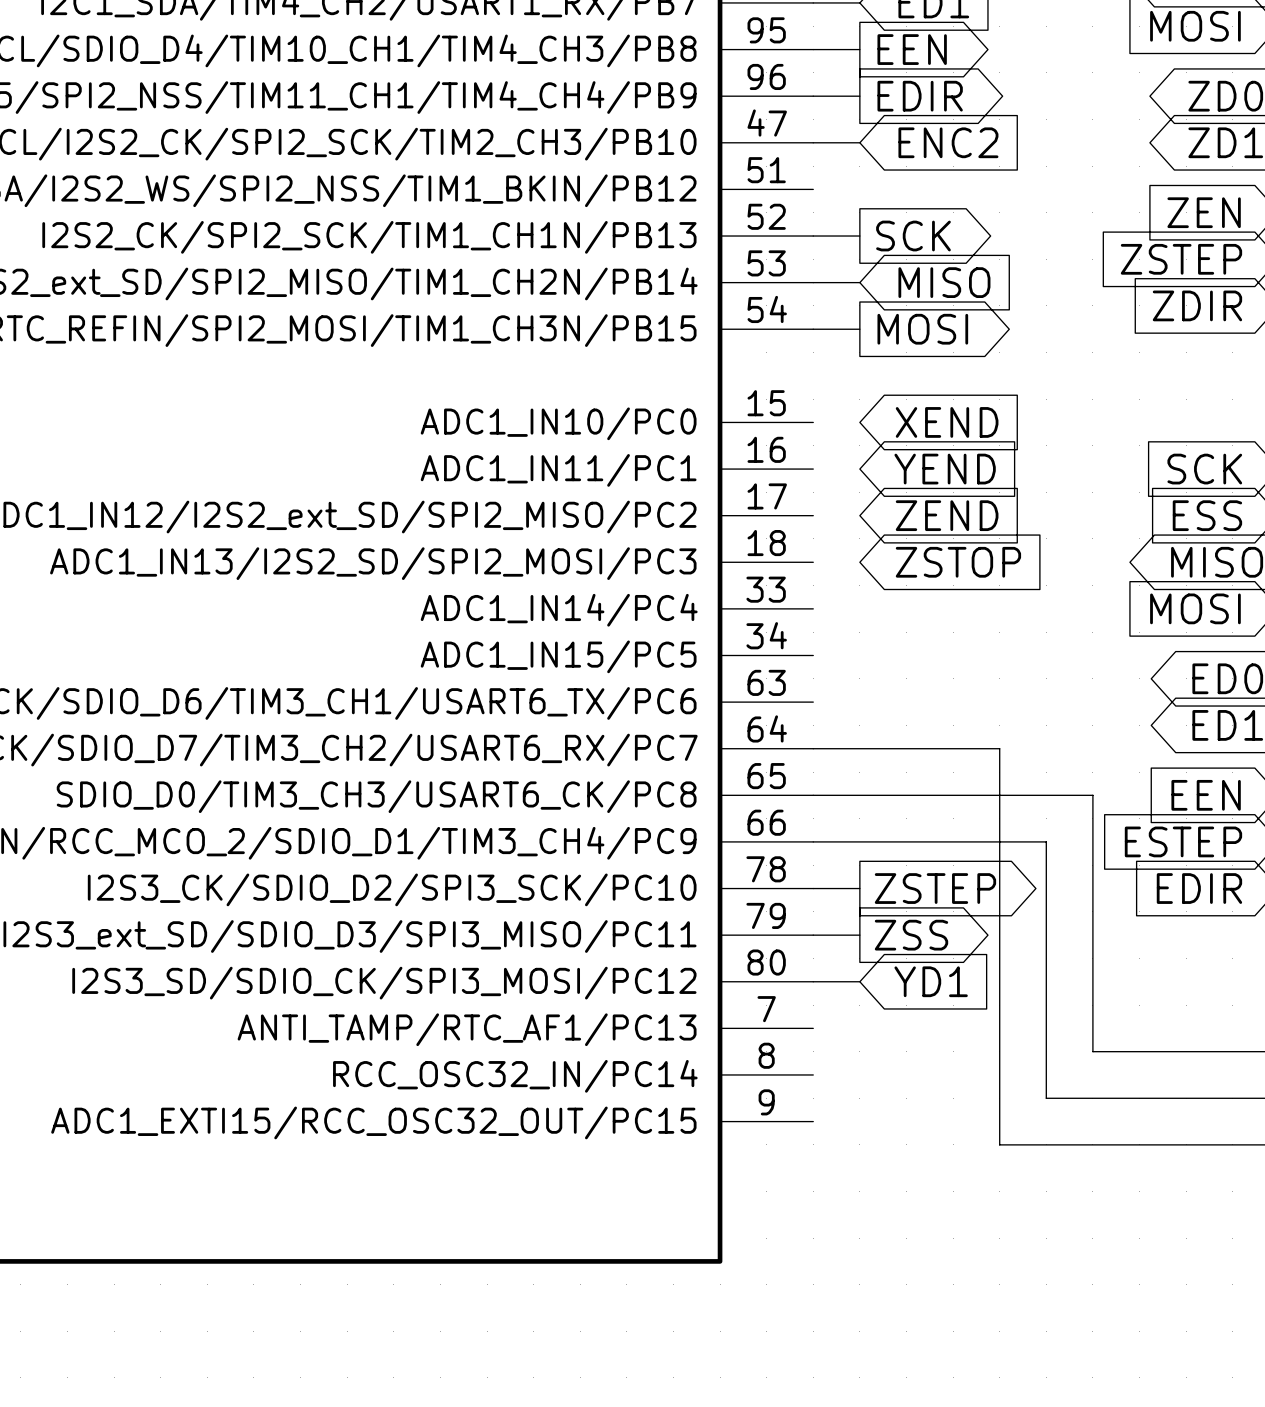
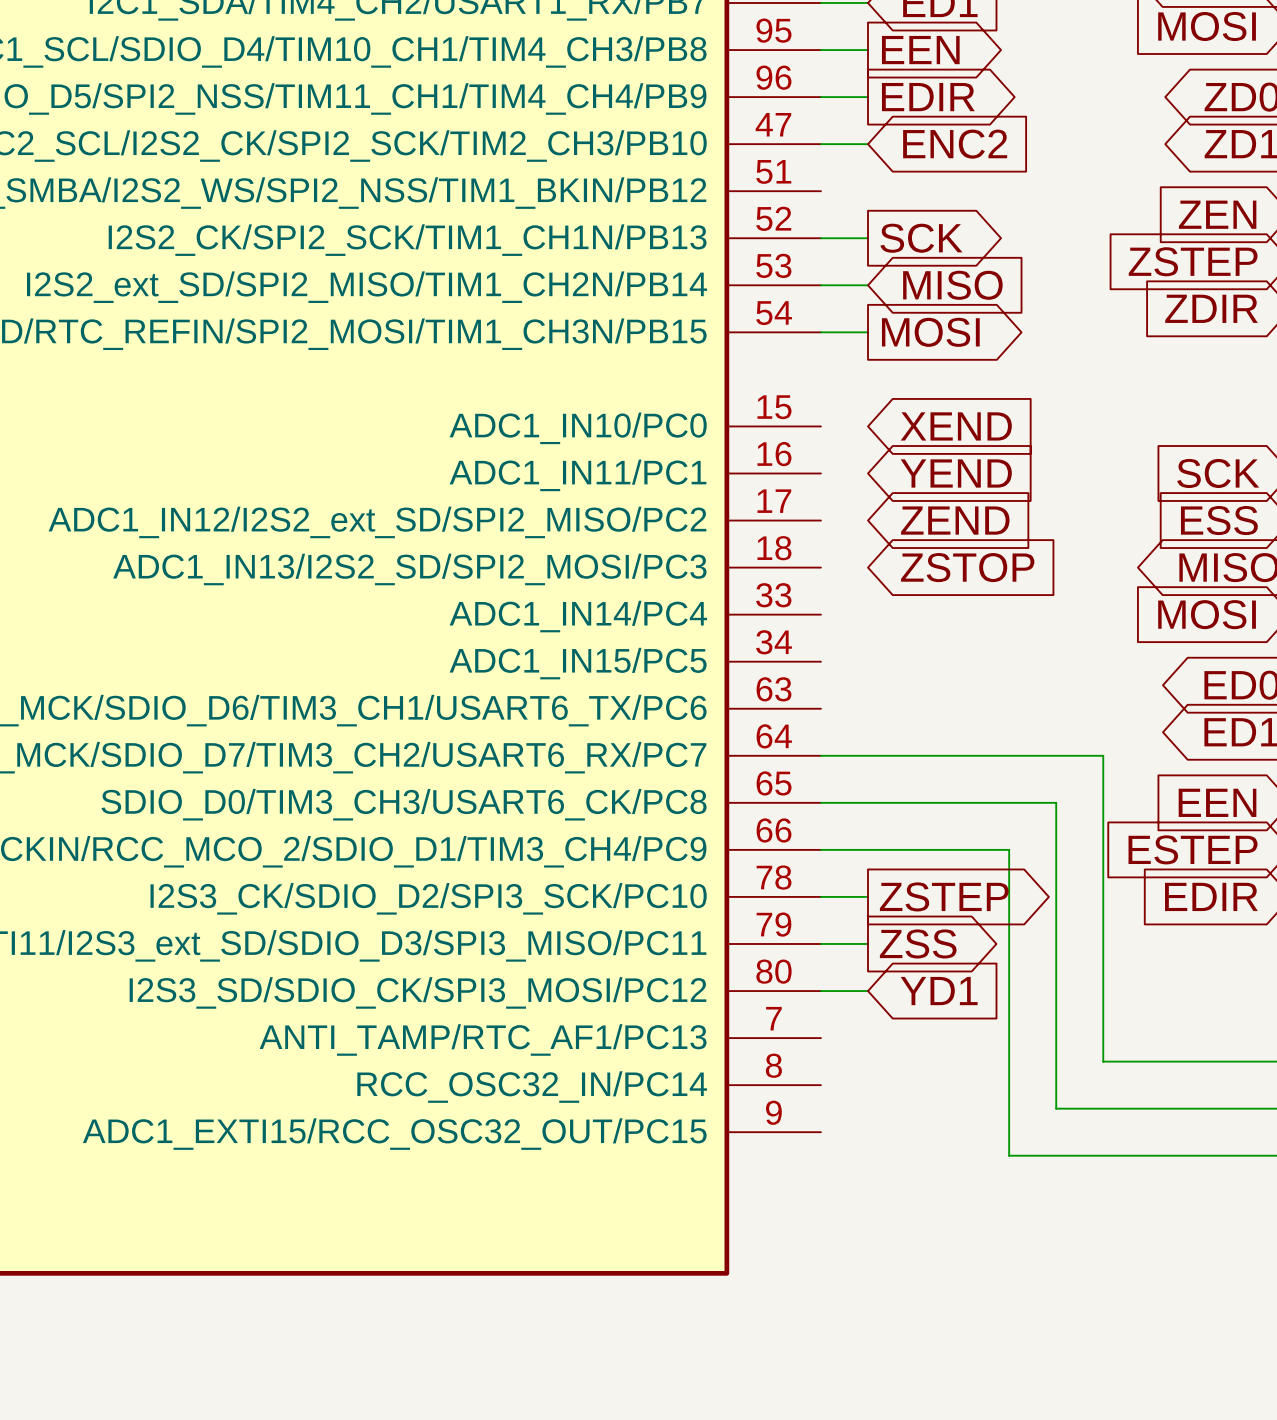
wire: (999, 748) (999, 841) (1046, 841) -> (1009, 755) (1103, 755) (1103, 802)
wire: (1046, 795) (1092, 795) -> (1056, 802) (1056, 849)

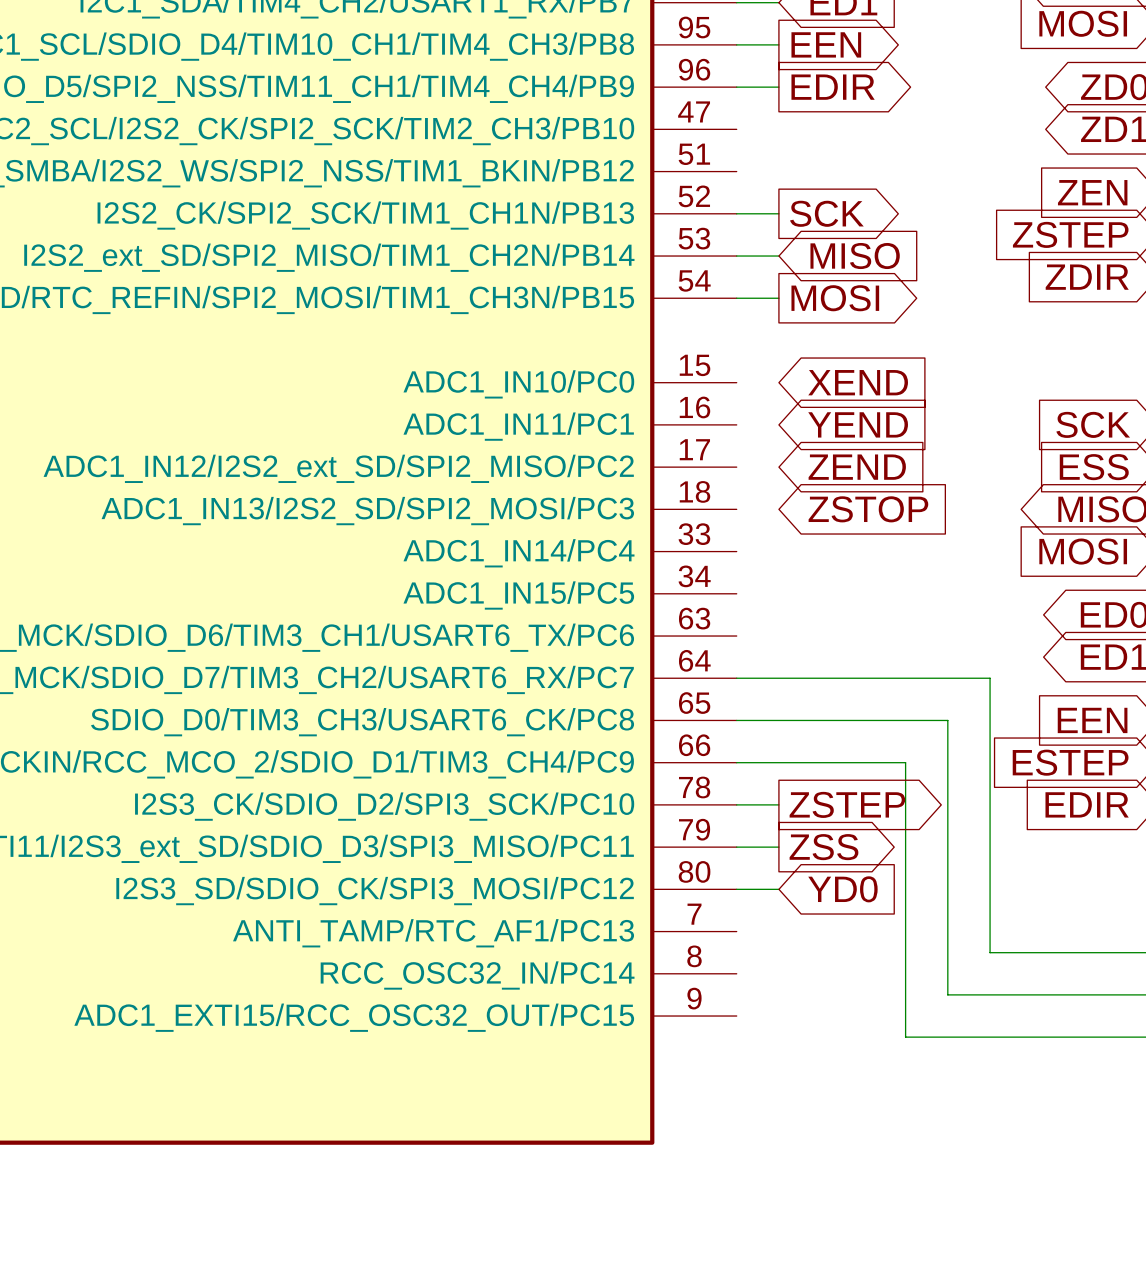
wire: (820, 144) (868, 144) -> none
global label: ENC2 (955, 144) -> none
global label: YD1 (939, 991) -> YD0 (842, 889)

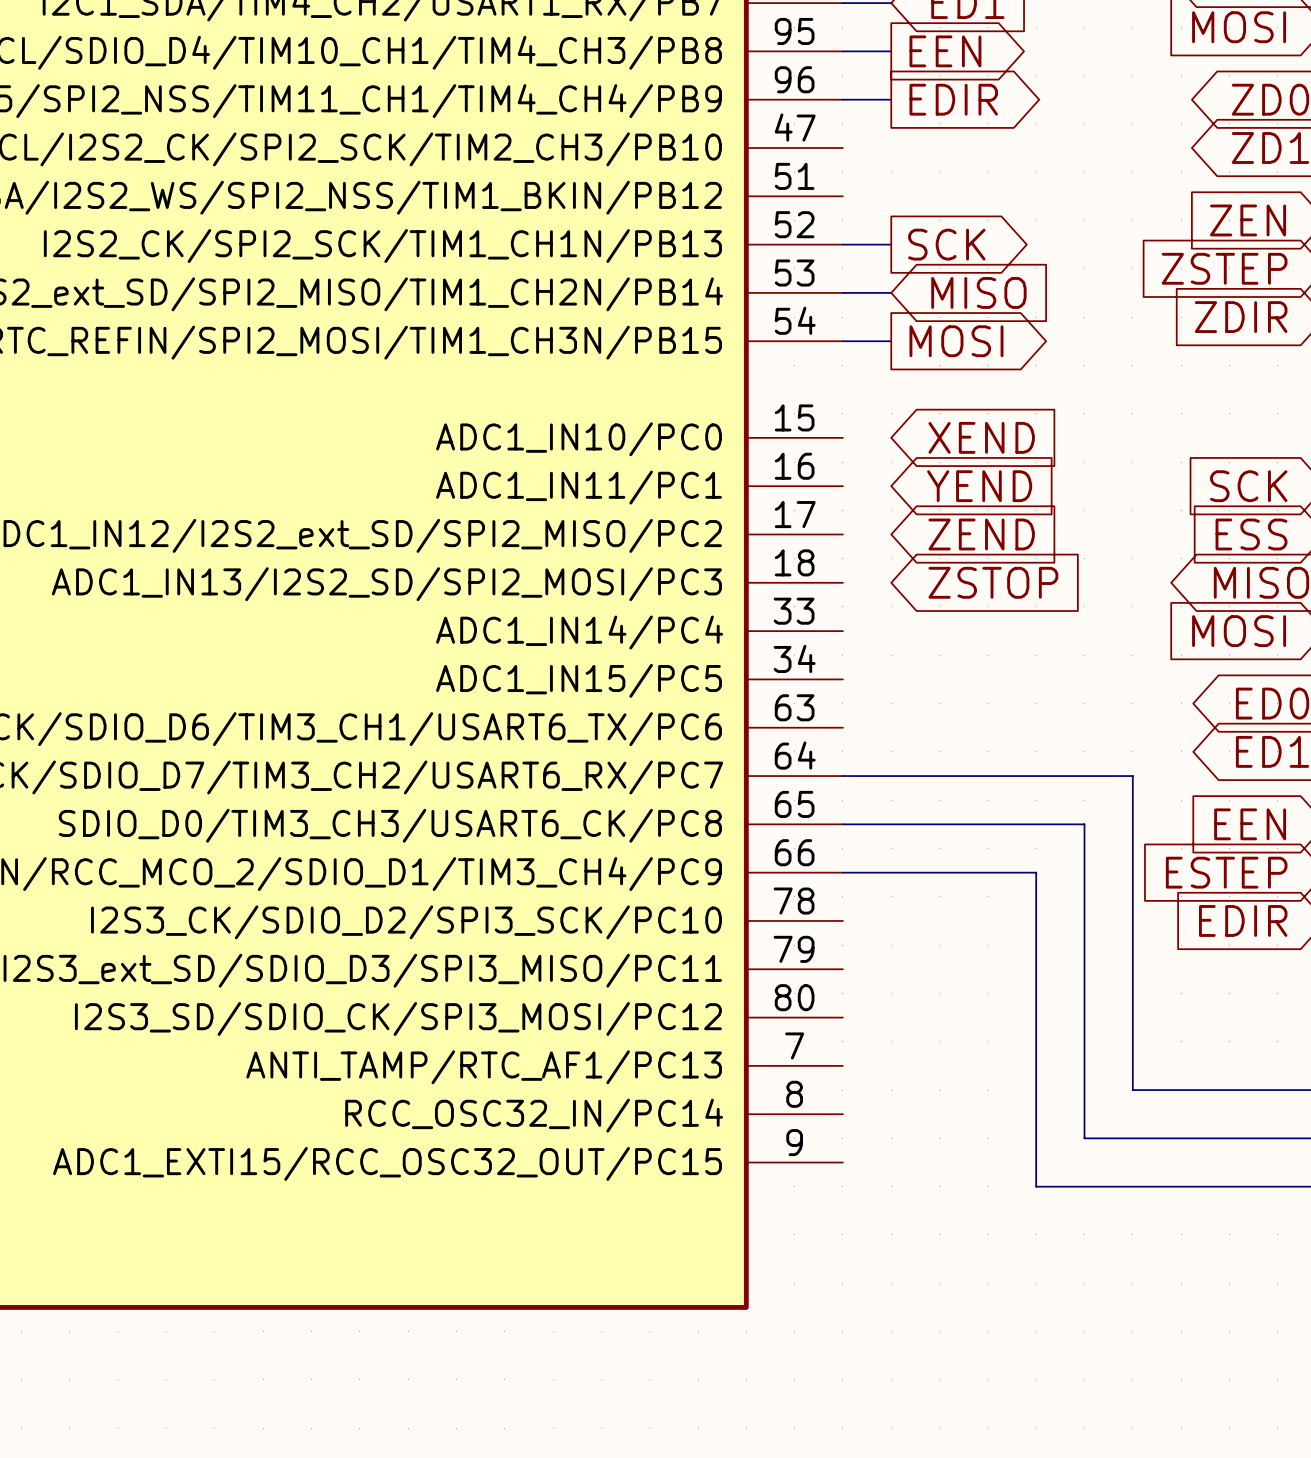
wire: (736, 804) (778, 804) -> none
global label: ZSTEP (847, 804) -> none
wire: (736, 847) (778, 847) -> none
global label: ZSS (823, 847) -> none
wire: (736, 889) (778, 889) -> none
global label: YD0 (842, 889) -> none

